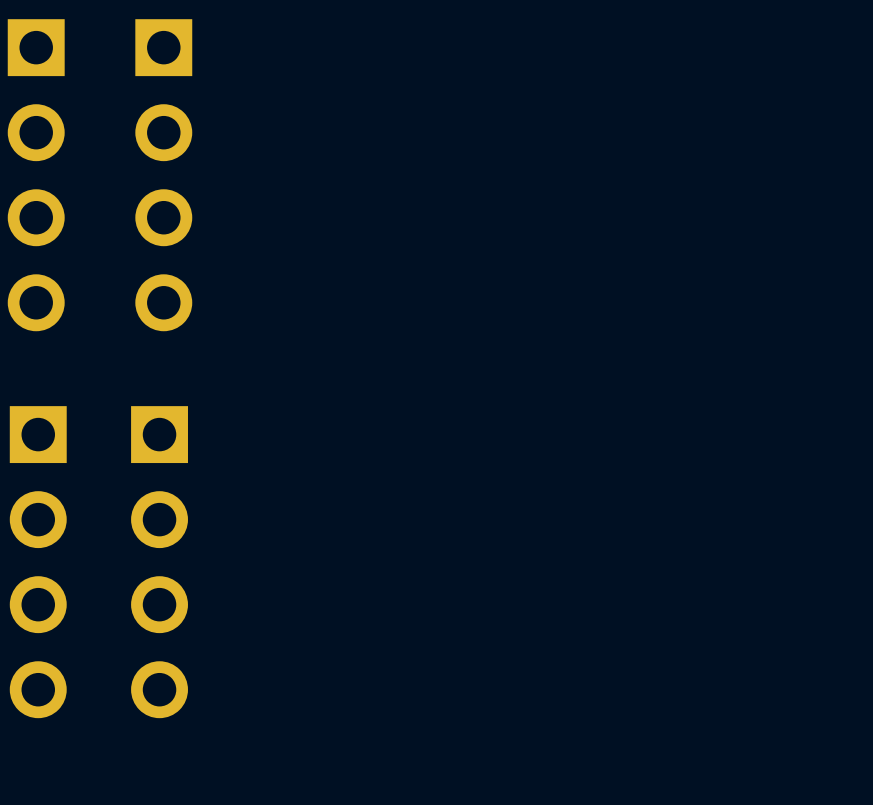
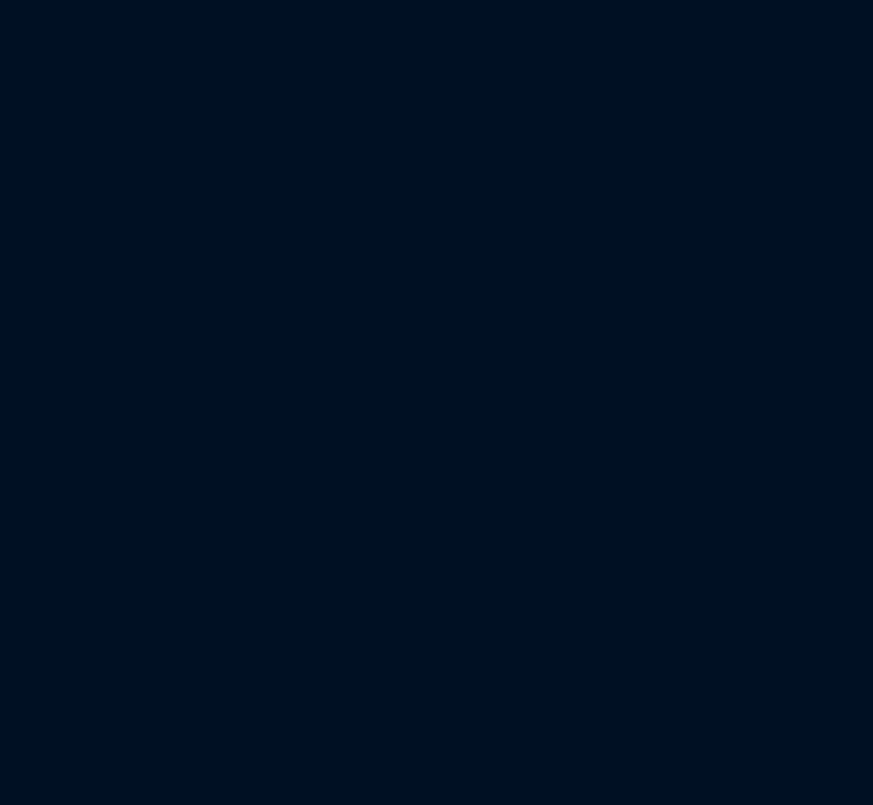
part: (36, 175) -> none
part: (163, 175) -> none
part: (38, 562) -> none
part: (159, 562) -> none

